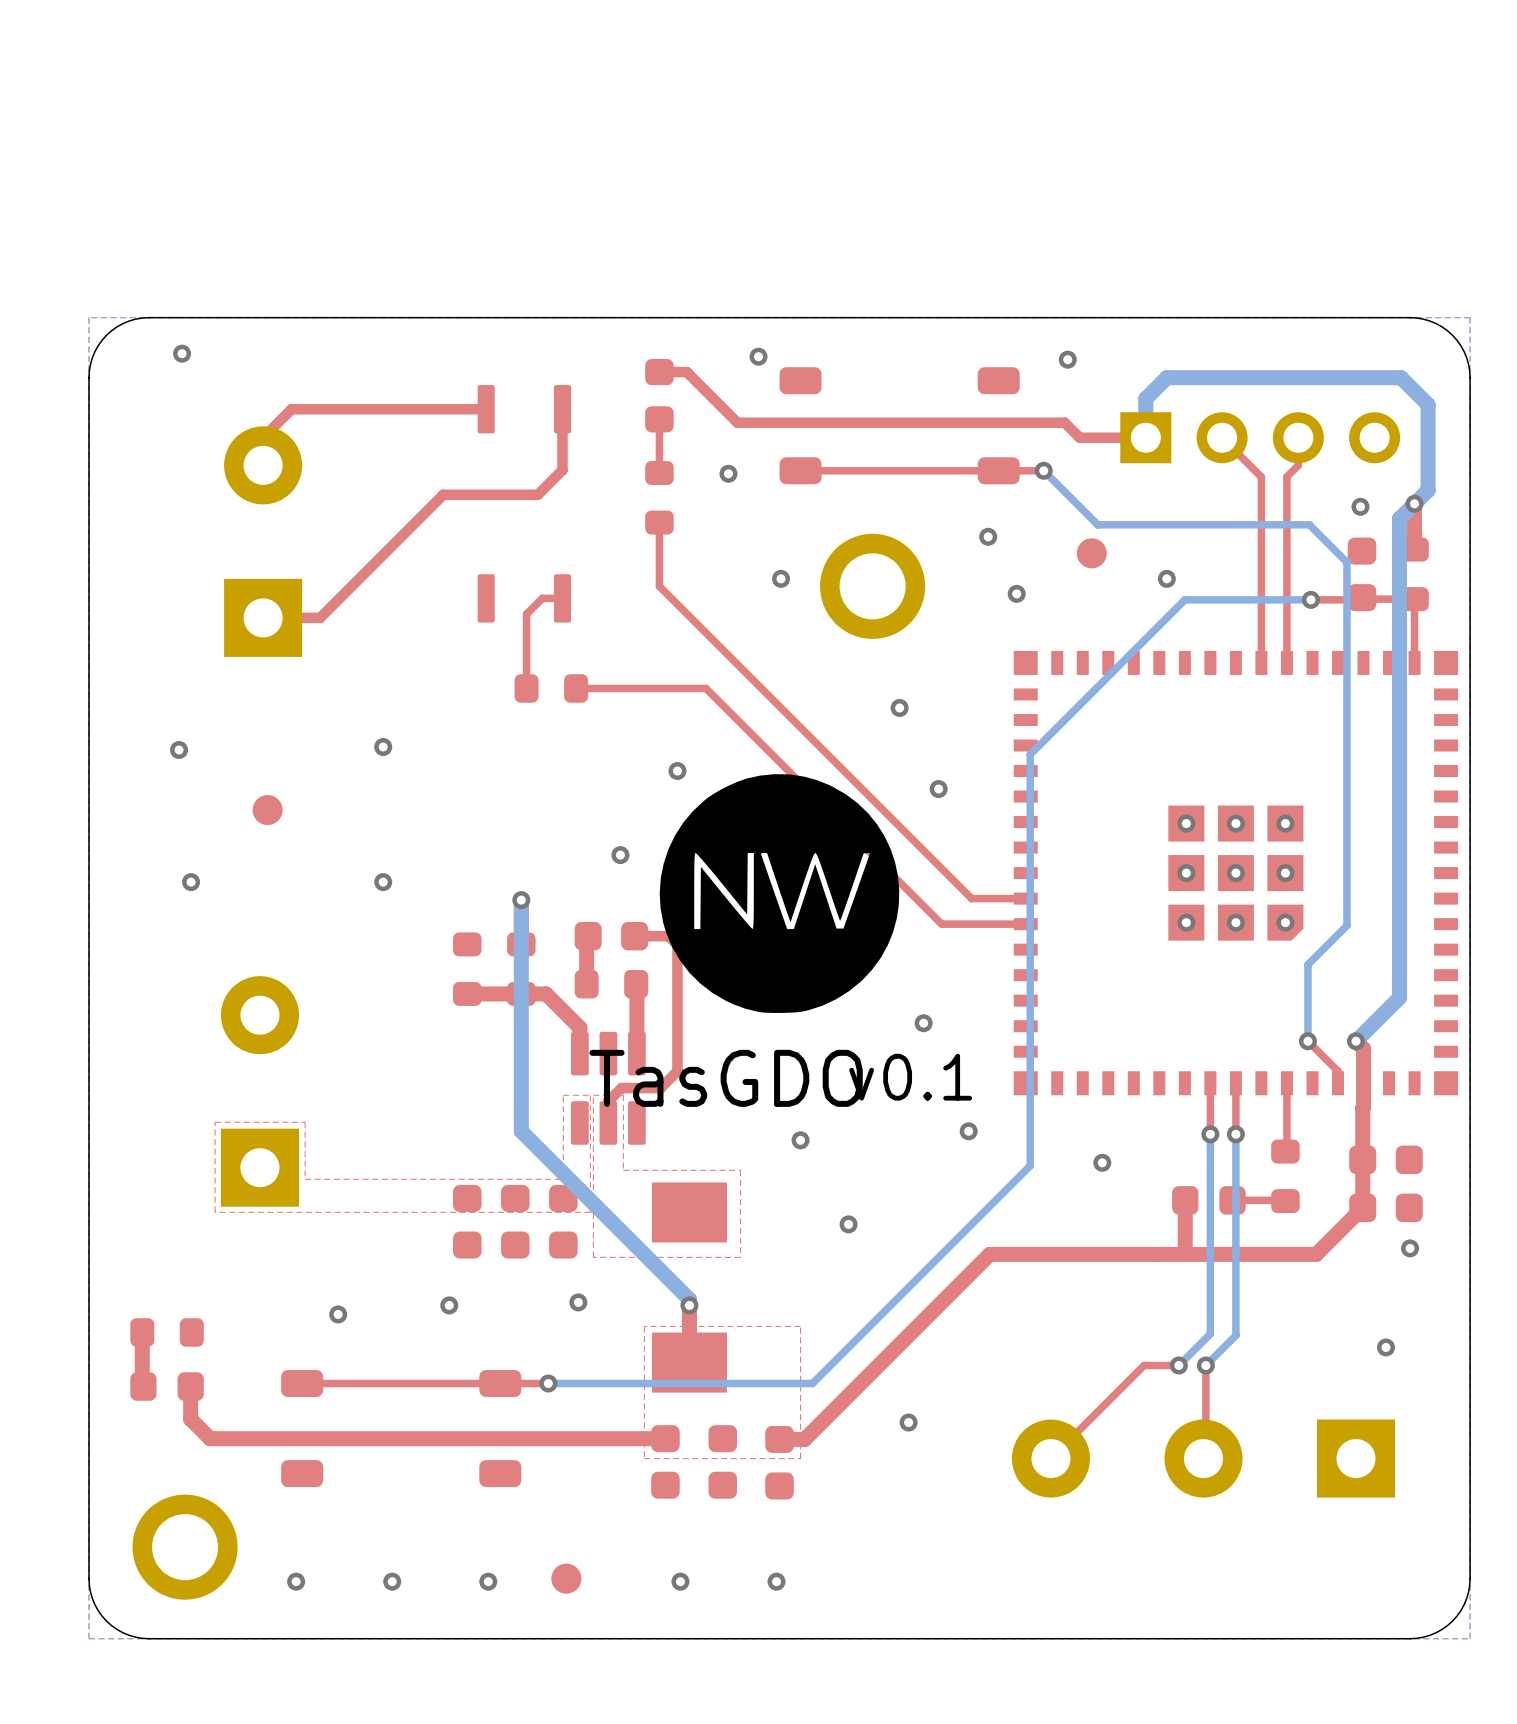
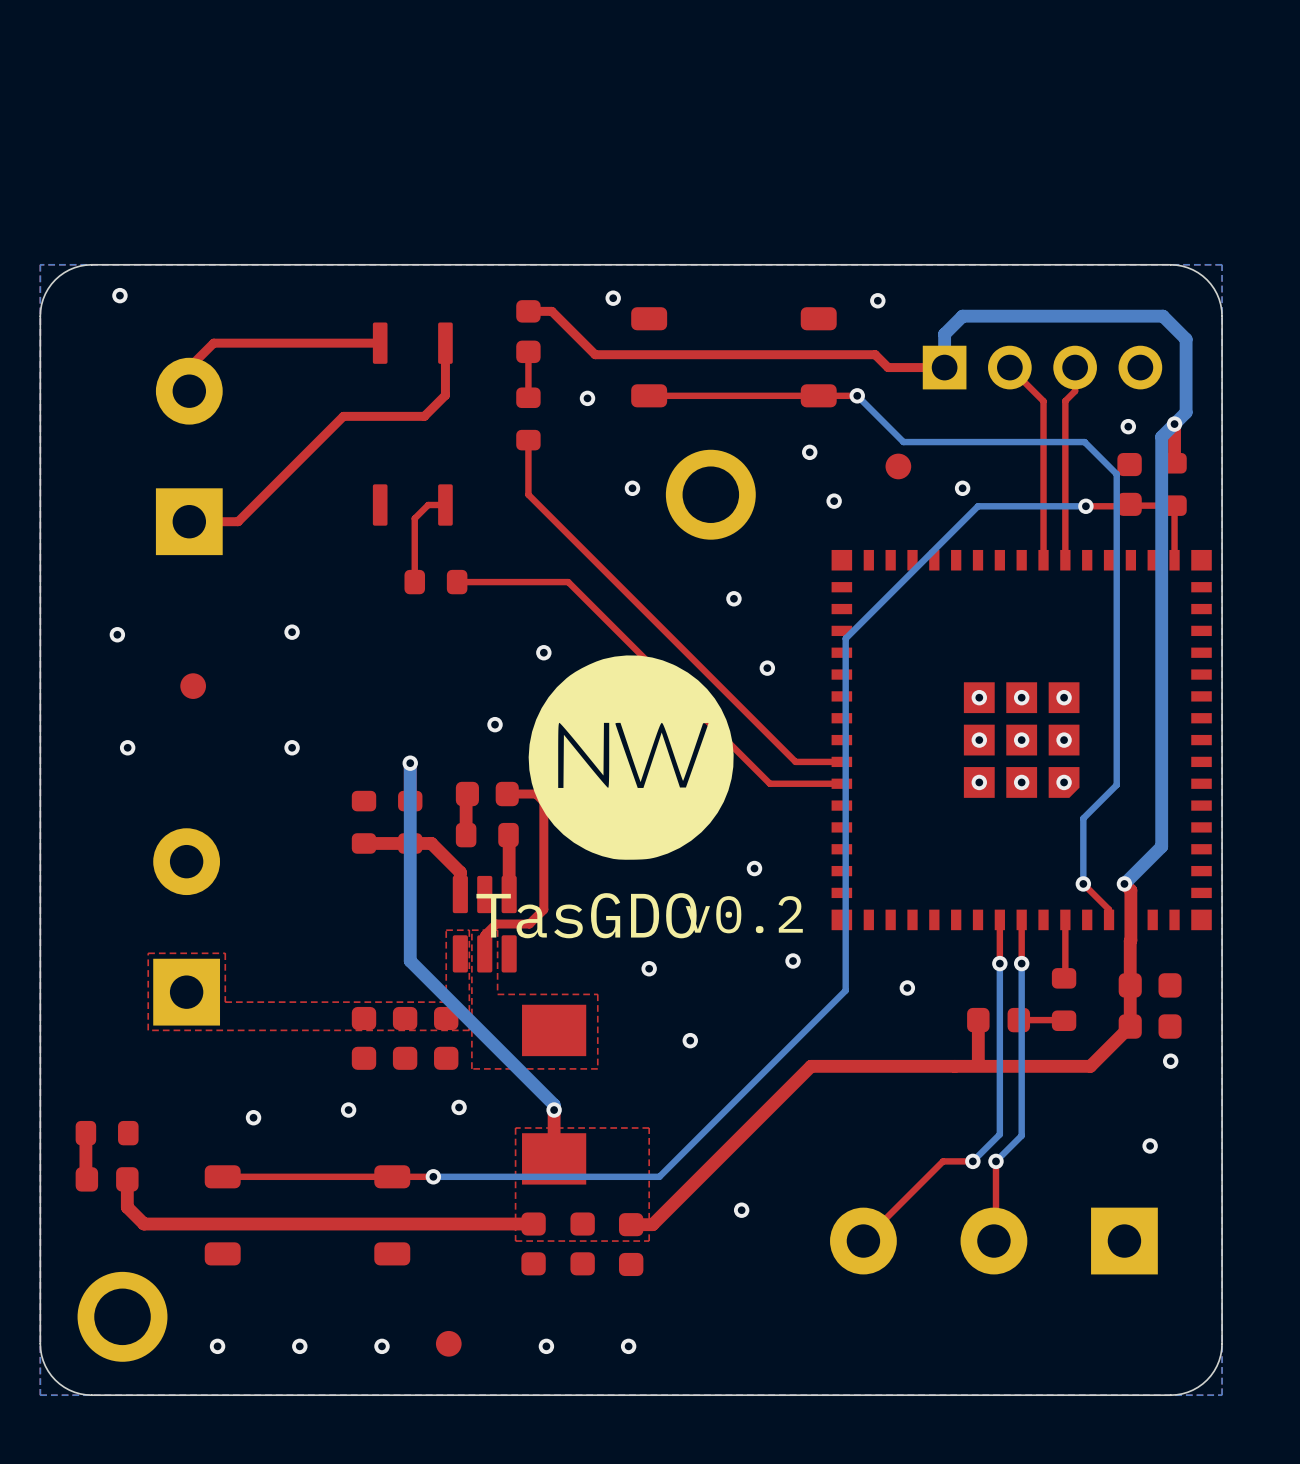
text: v0.1 (910, 1077) -> v0.2 (744, 914)

